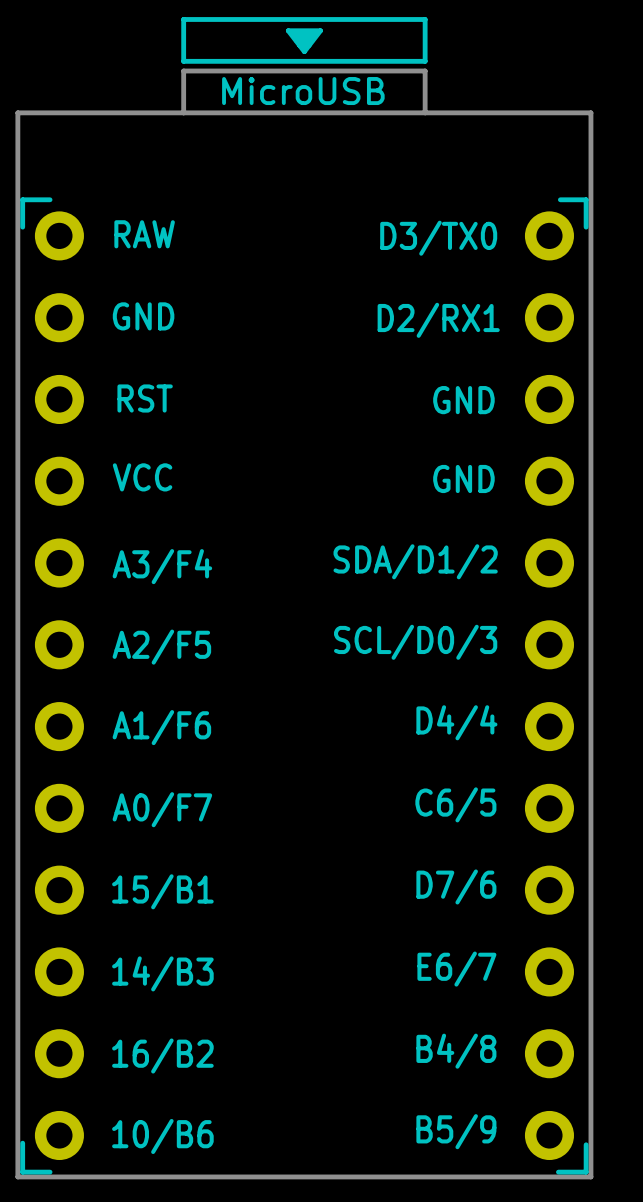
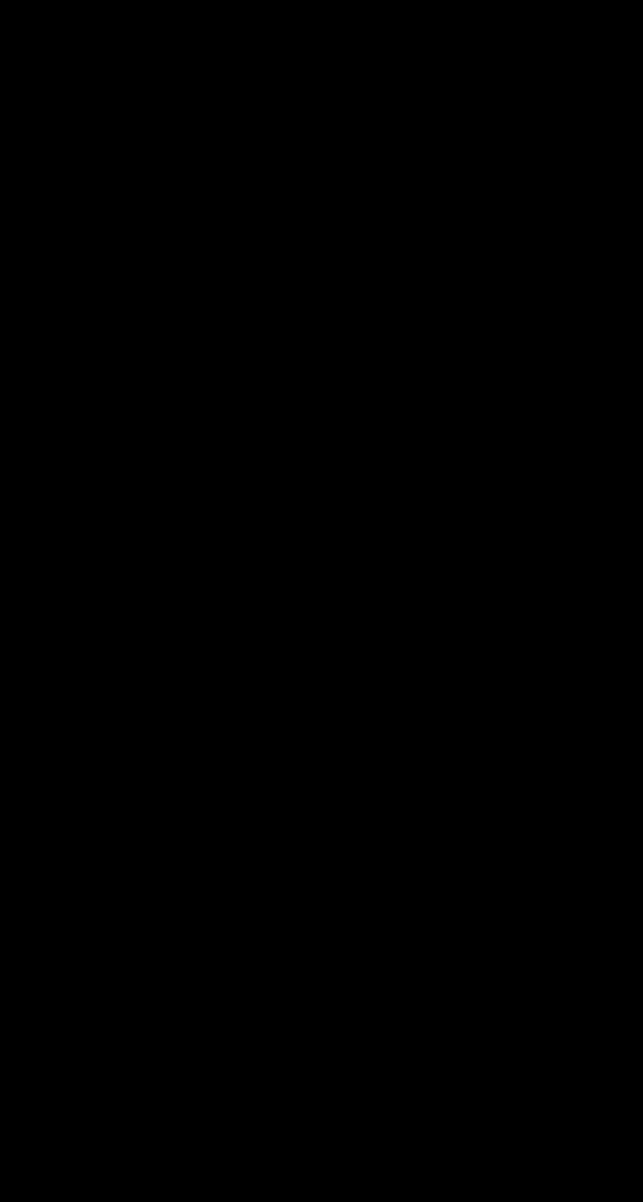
part: (304, 598) -> none

